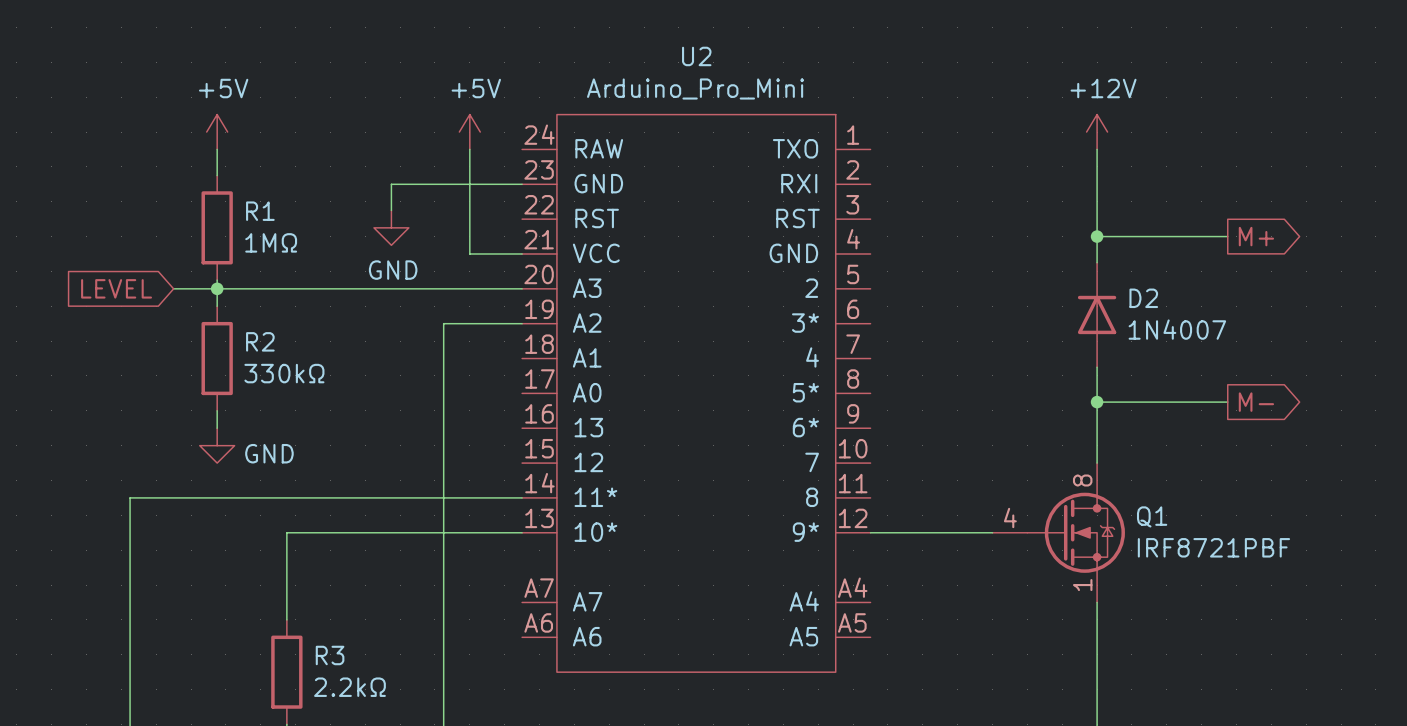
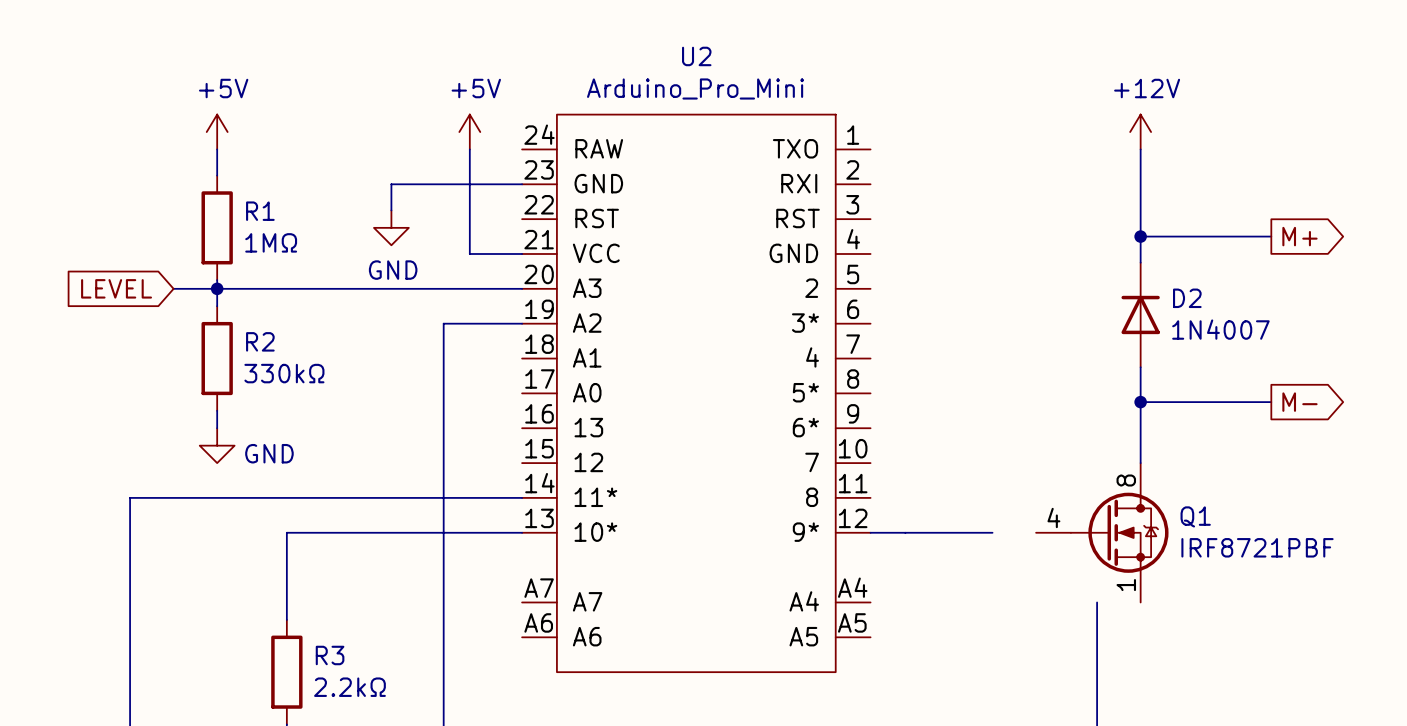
power symbol position: +12V (1097, 132) -> +12V (1140, 132)
wire: (1097, 149) (1097, 262) -> (1140, 149) (1140, 262)
wire: (1097, 236) (1140, 236) -> (1227, 236) (1271, 236)
junction position: (1097, 236) -> (1140, 236)
global label position: M+ (1256, 236) -> M+ (1299, 236)
D2 position: (1097, 314) -> (1140, 314)
wire: (1097, 367) (1097, 463) -> (1140, 367) (1140, 463)
wire: (1097, 402) (1140, 402) -> (1227, 402) (1271, 402)
junction position: (1097, 402) -> (1140, 402)
global label position: M- (1256, 402) -> M- (1299, 402)
Q1 position: (1058, 532) -> (1102, 532)

